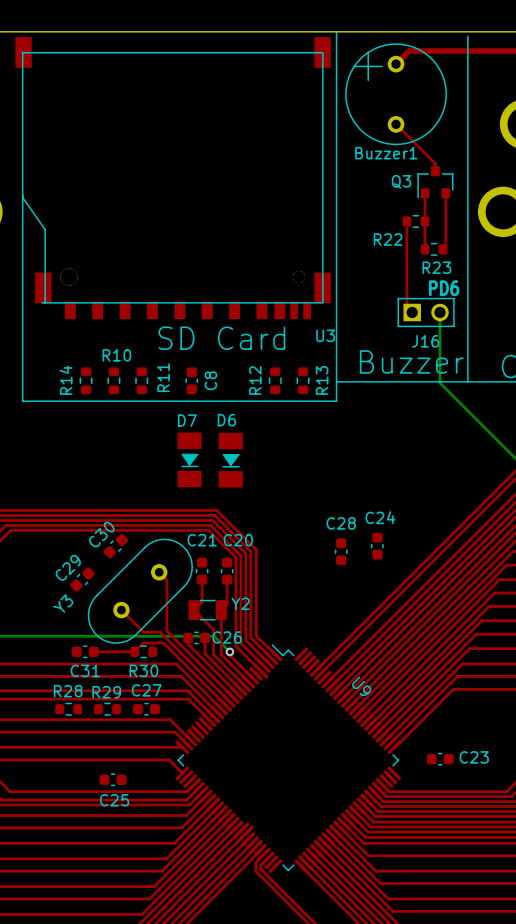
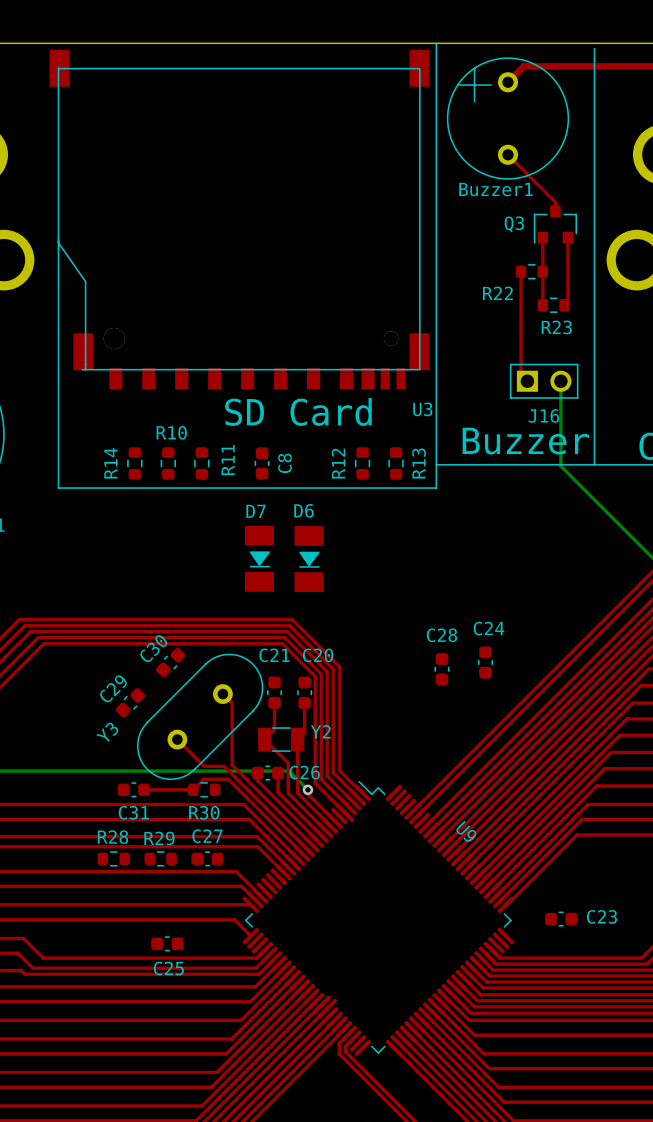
text: PD6 (444, 288) -> none

